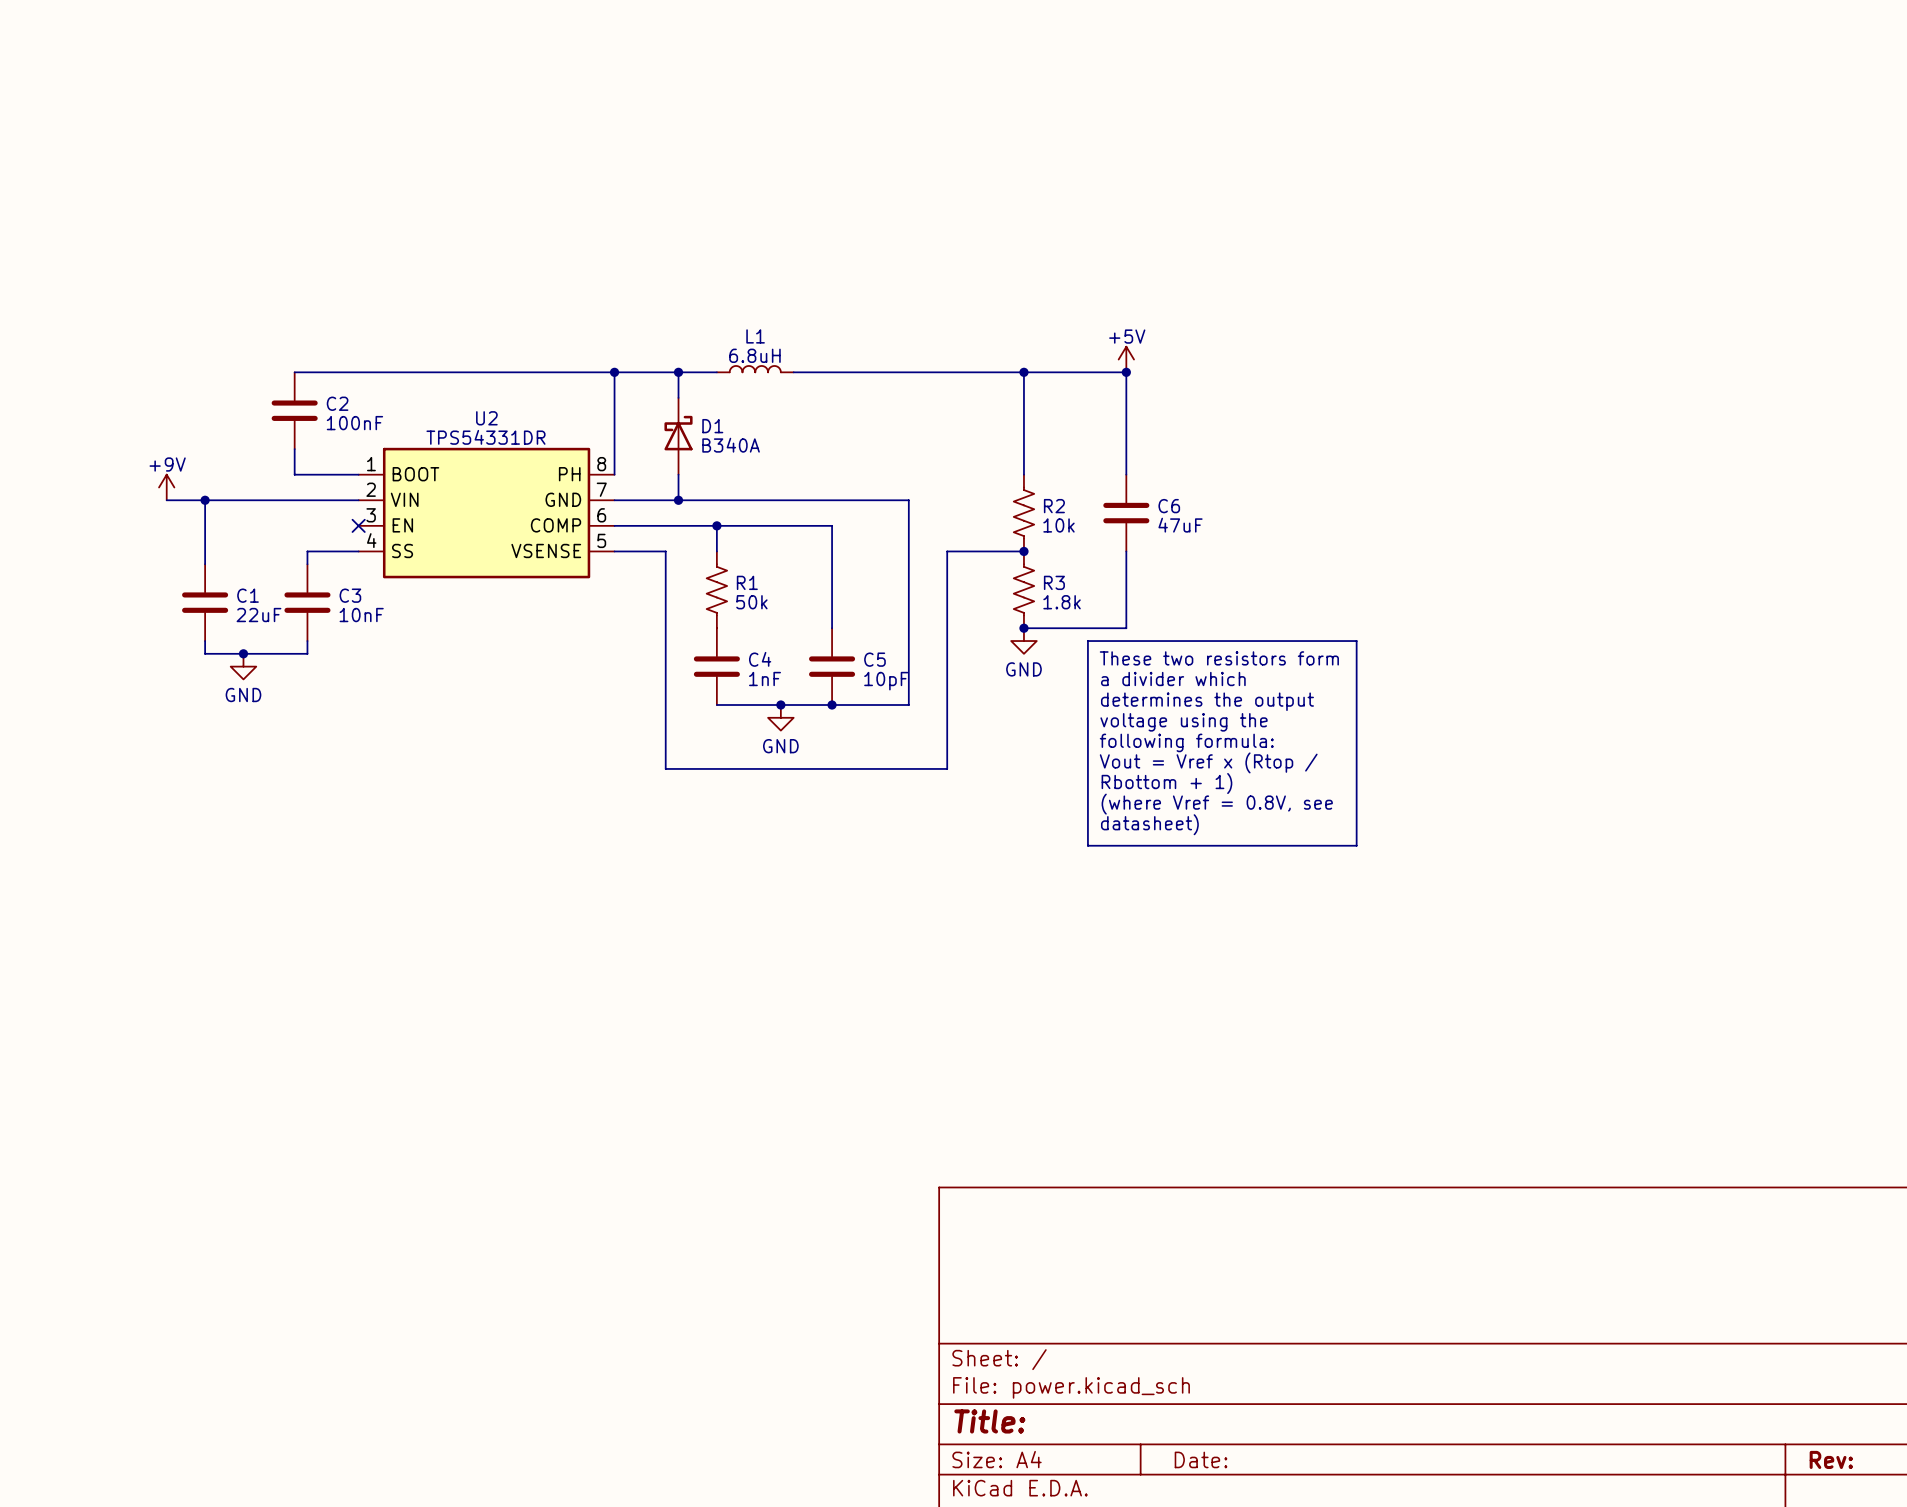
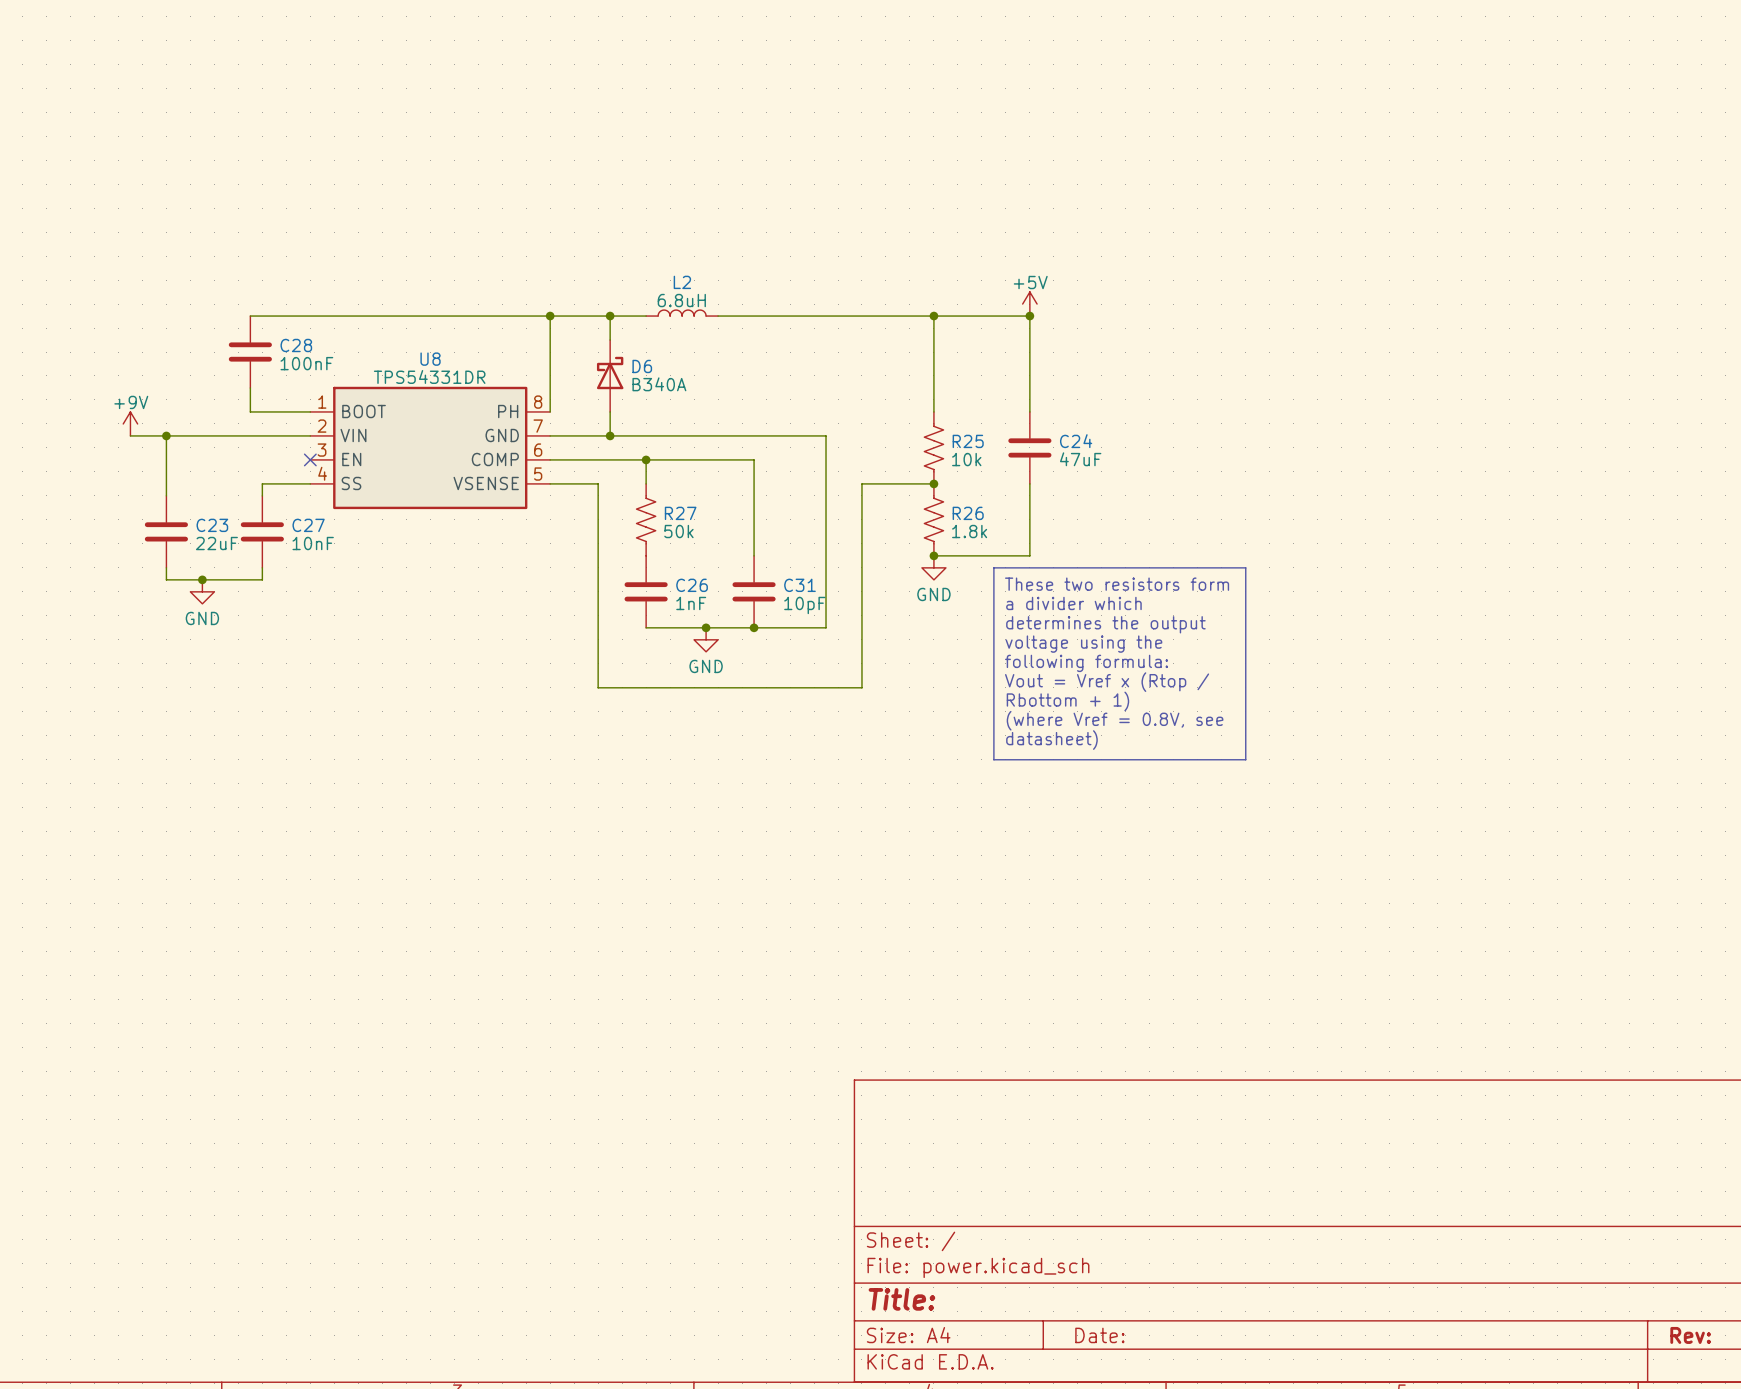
L1 name: L1 (755, 336) -> L2 (682, 282)
C2 name: C2 (337, 403) -> C28 (296, 345)
U2 name: U2 (486, 418) -> U8 (430, 359)
D1 name: D1 (712, 426) -> D6 (642, 366)
R2 name: R2 (1054, 506) -> R25 (968, 441)
C6 name: C6 (1169, 506) -> C24 (1076, 441)
R1 name: R1 (747, 582) -> R27 (680, 513)
R3 name: R3 (1054, 582) -> R26 (968, 513)
C1 name: C1 (248, 595) -> C23 (212, 525)
C3 name: C3 (350, 595) -> C27 (308, 525)
C4 name: C4 (760, 659) -> C26 (692, 585)
C5 name: C5 (874, 659) -> C31 (800, 585)

